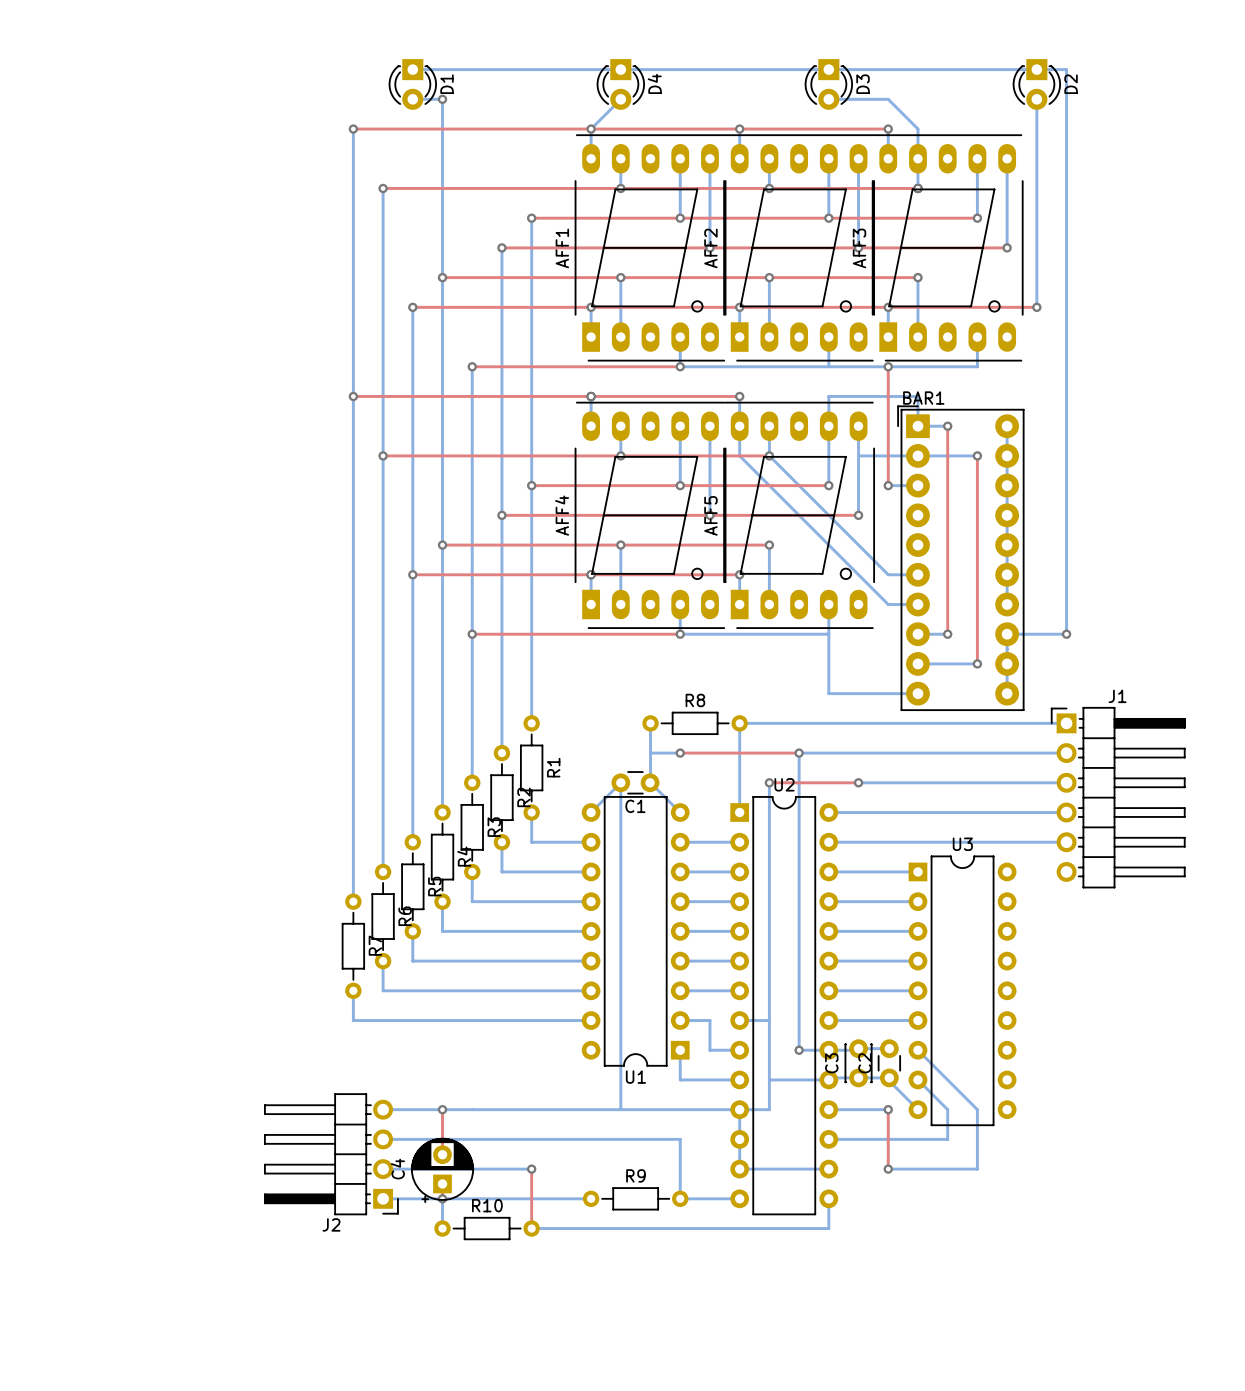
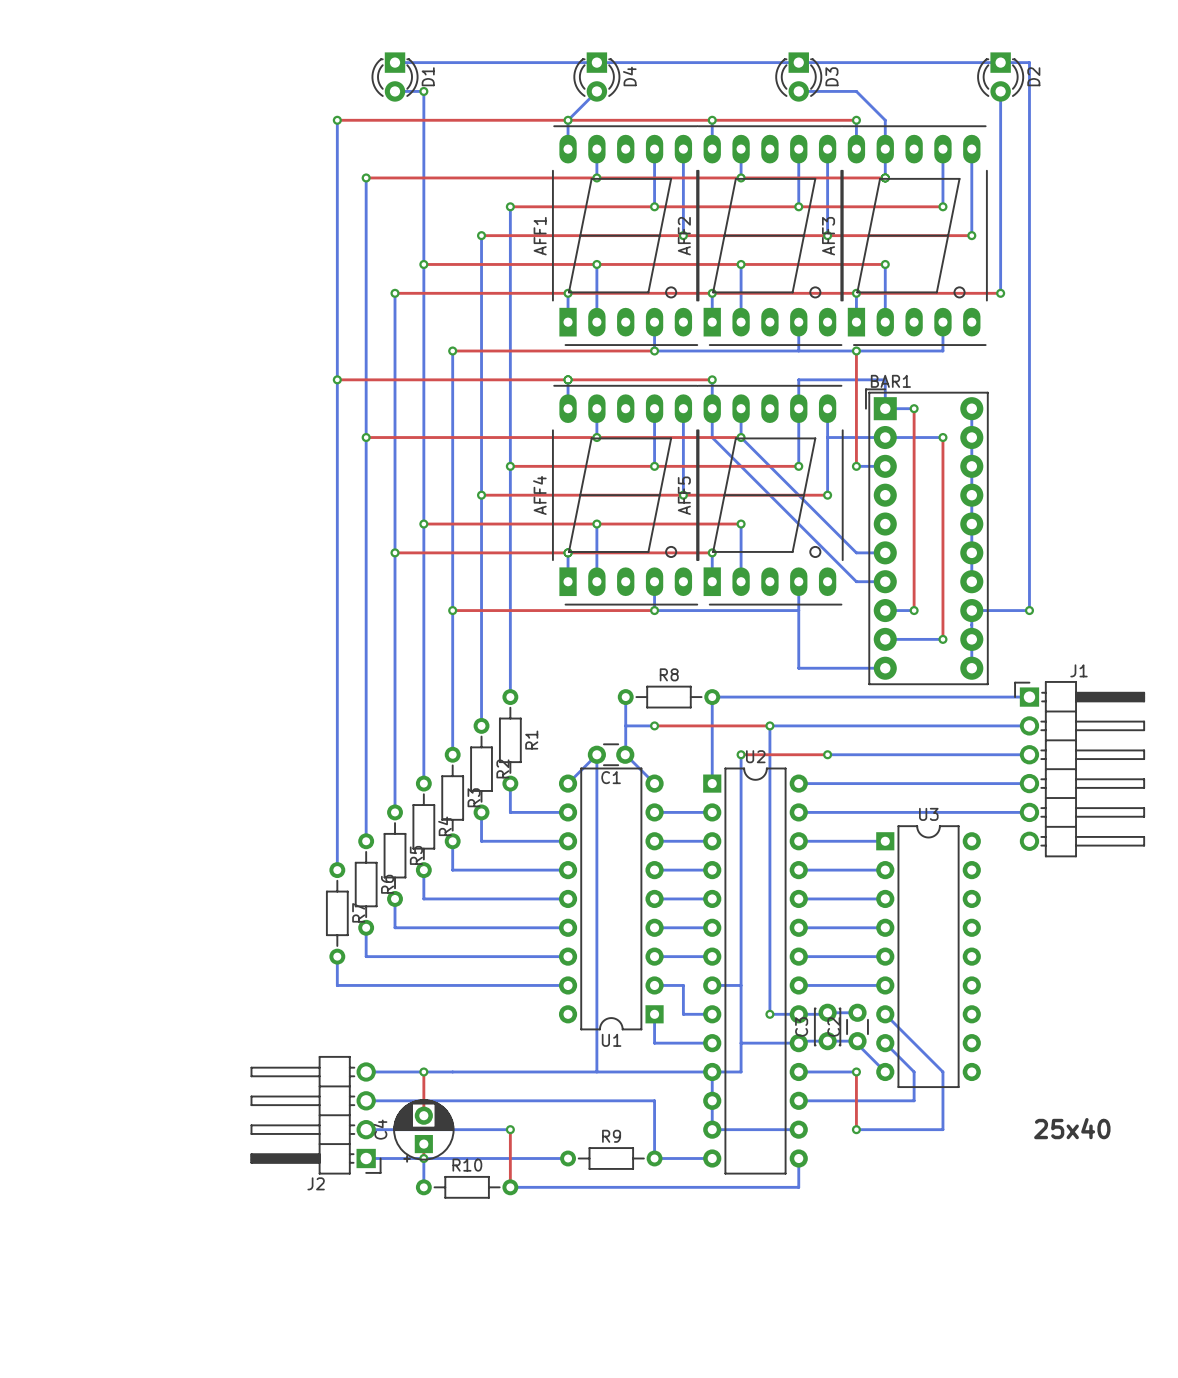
text: none -> 25x40 (1072, 1128)

